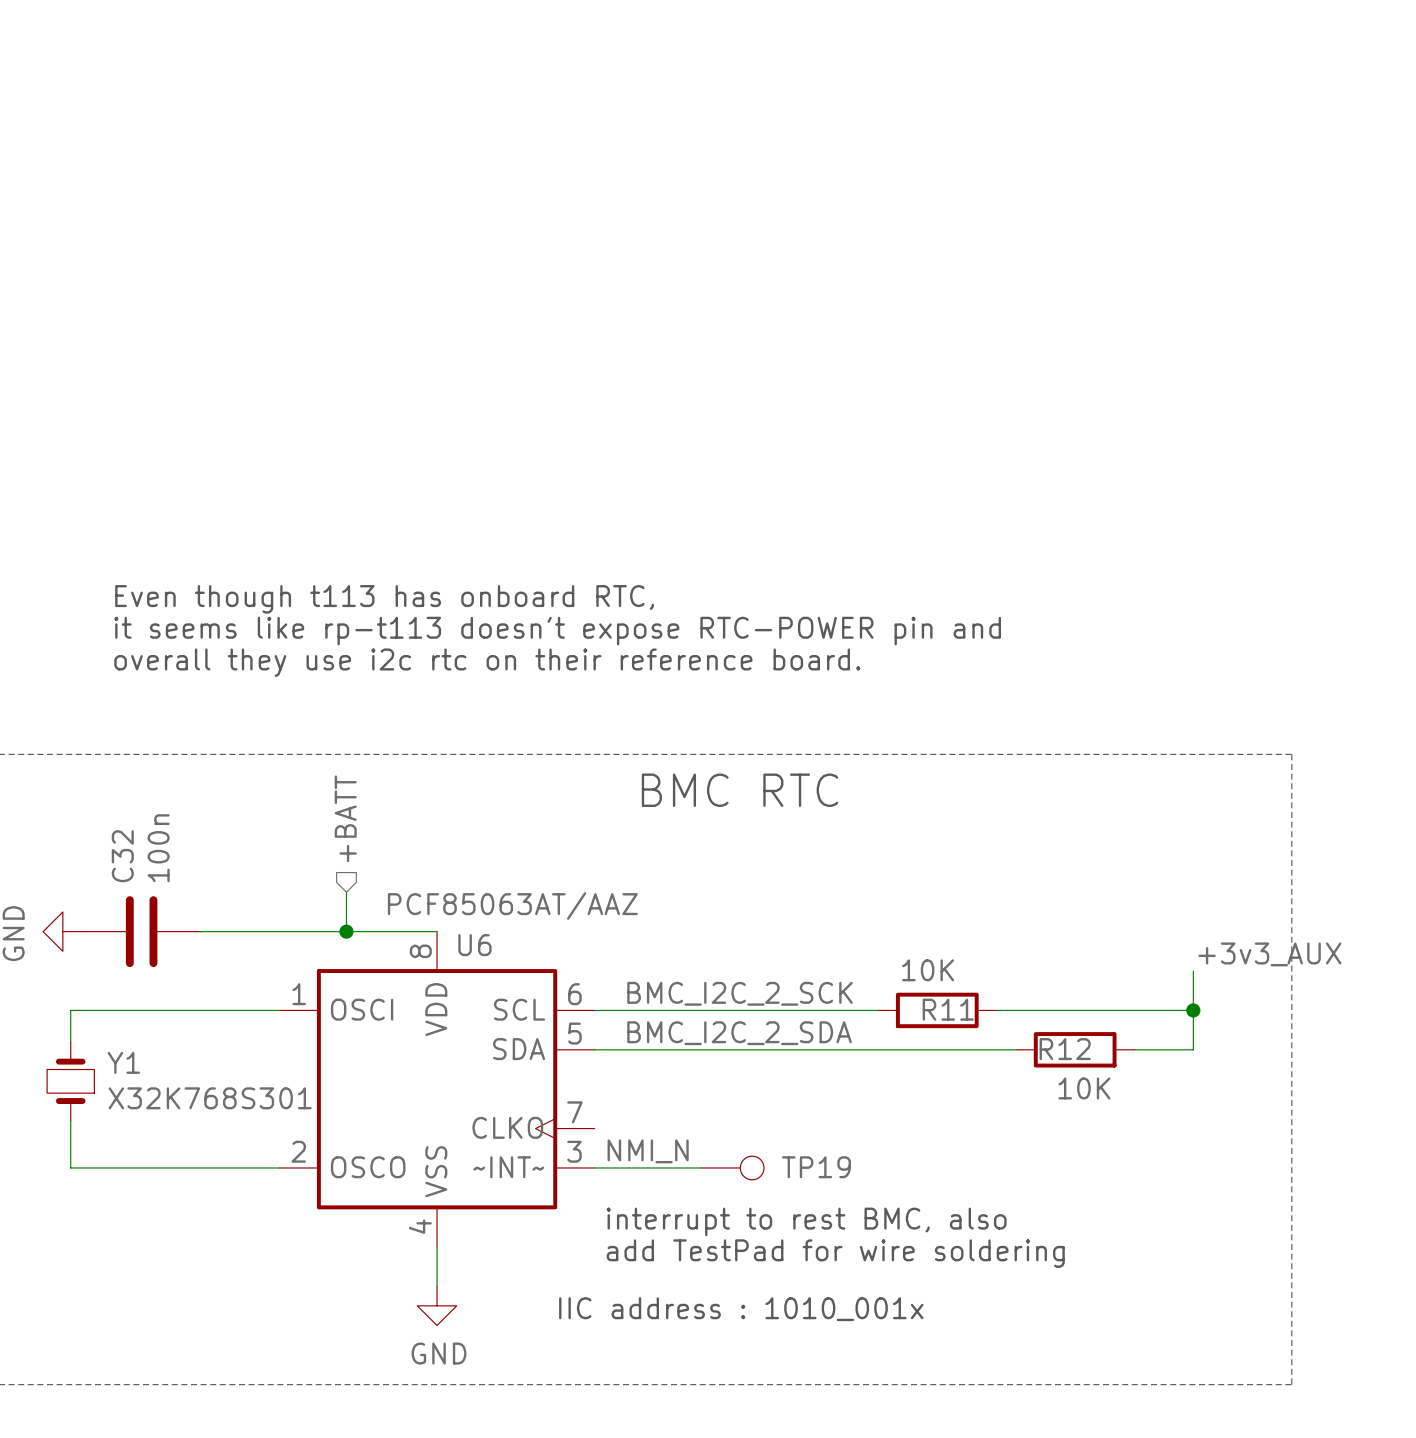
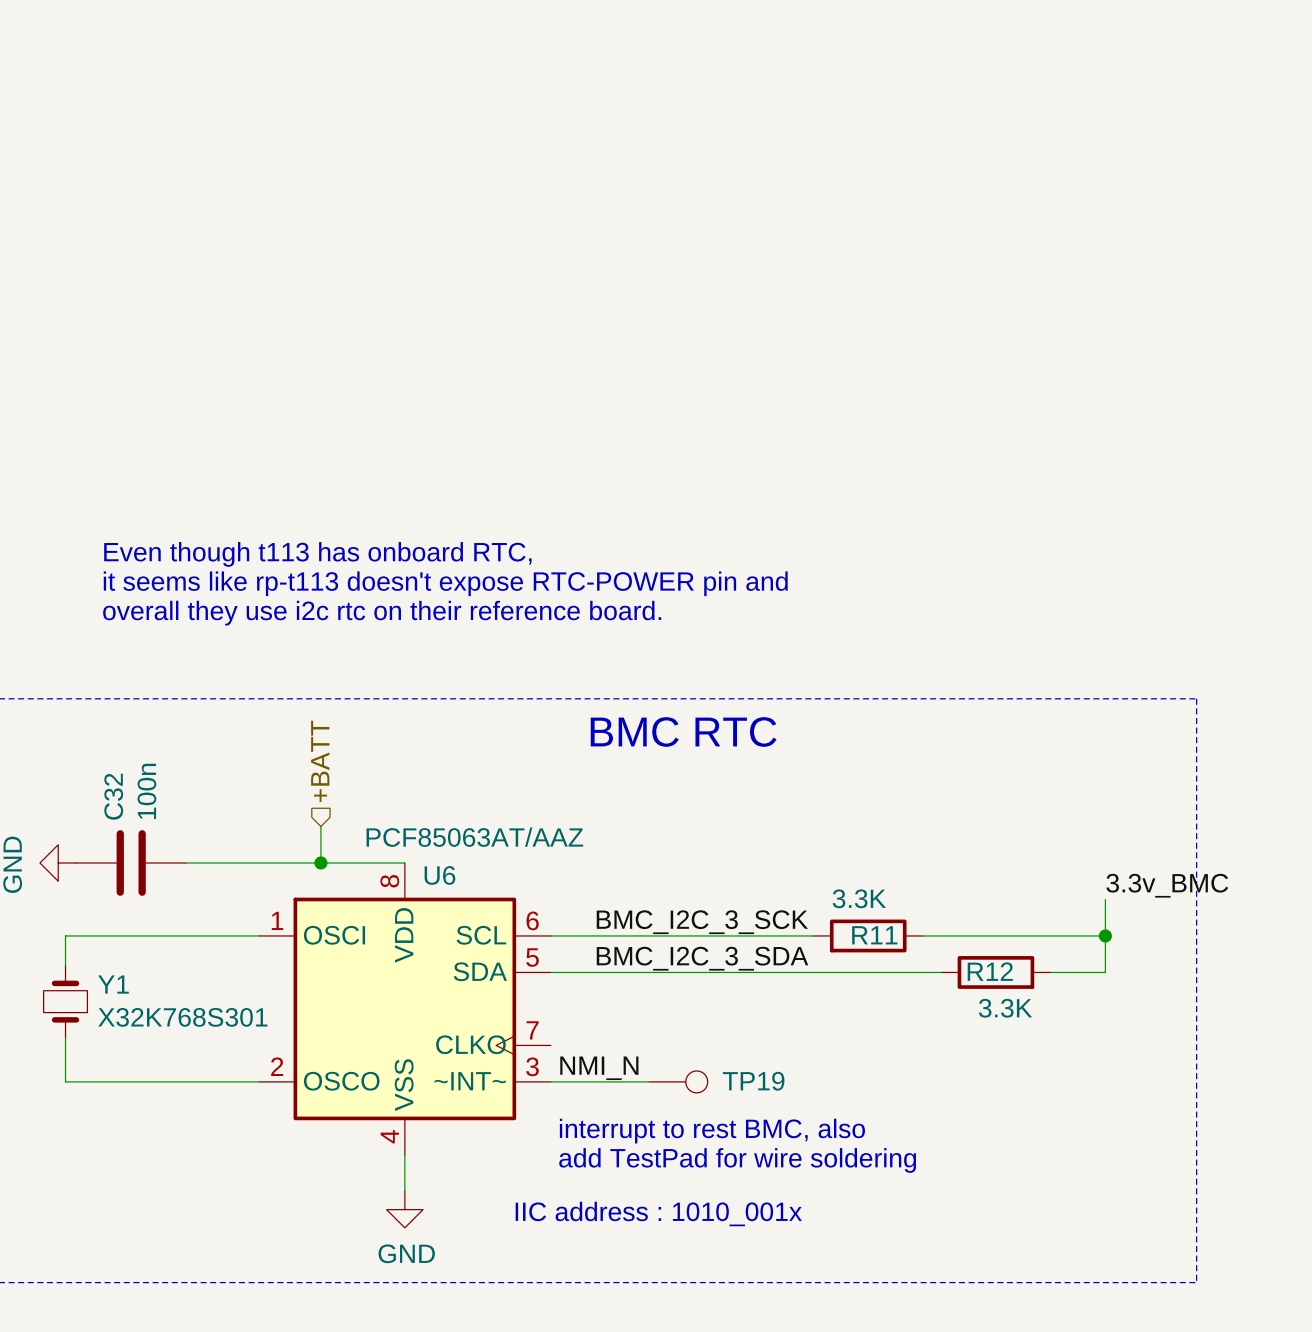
label: +3v3_AUX (1269, 954) -> 3.3v_BMC (1167, 885)
R11 value: 10K (928, 970) -> 3.3K (859, 898)
label: BMC_I2C_2_SCK (740, 993) -> BMC_I2C_3_SCK (702, 922)
label: BMC_I2C_2_SDA (739, 1033) -> BMC_I2C_3_SDA (702, 958)
R12 value: 10K (1084, 1088) -> 3.3K (1005, 1008)

